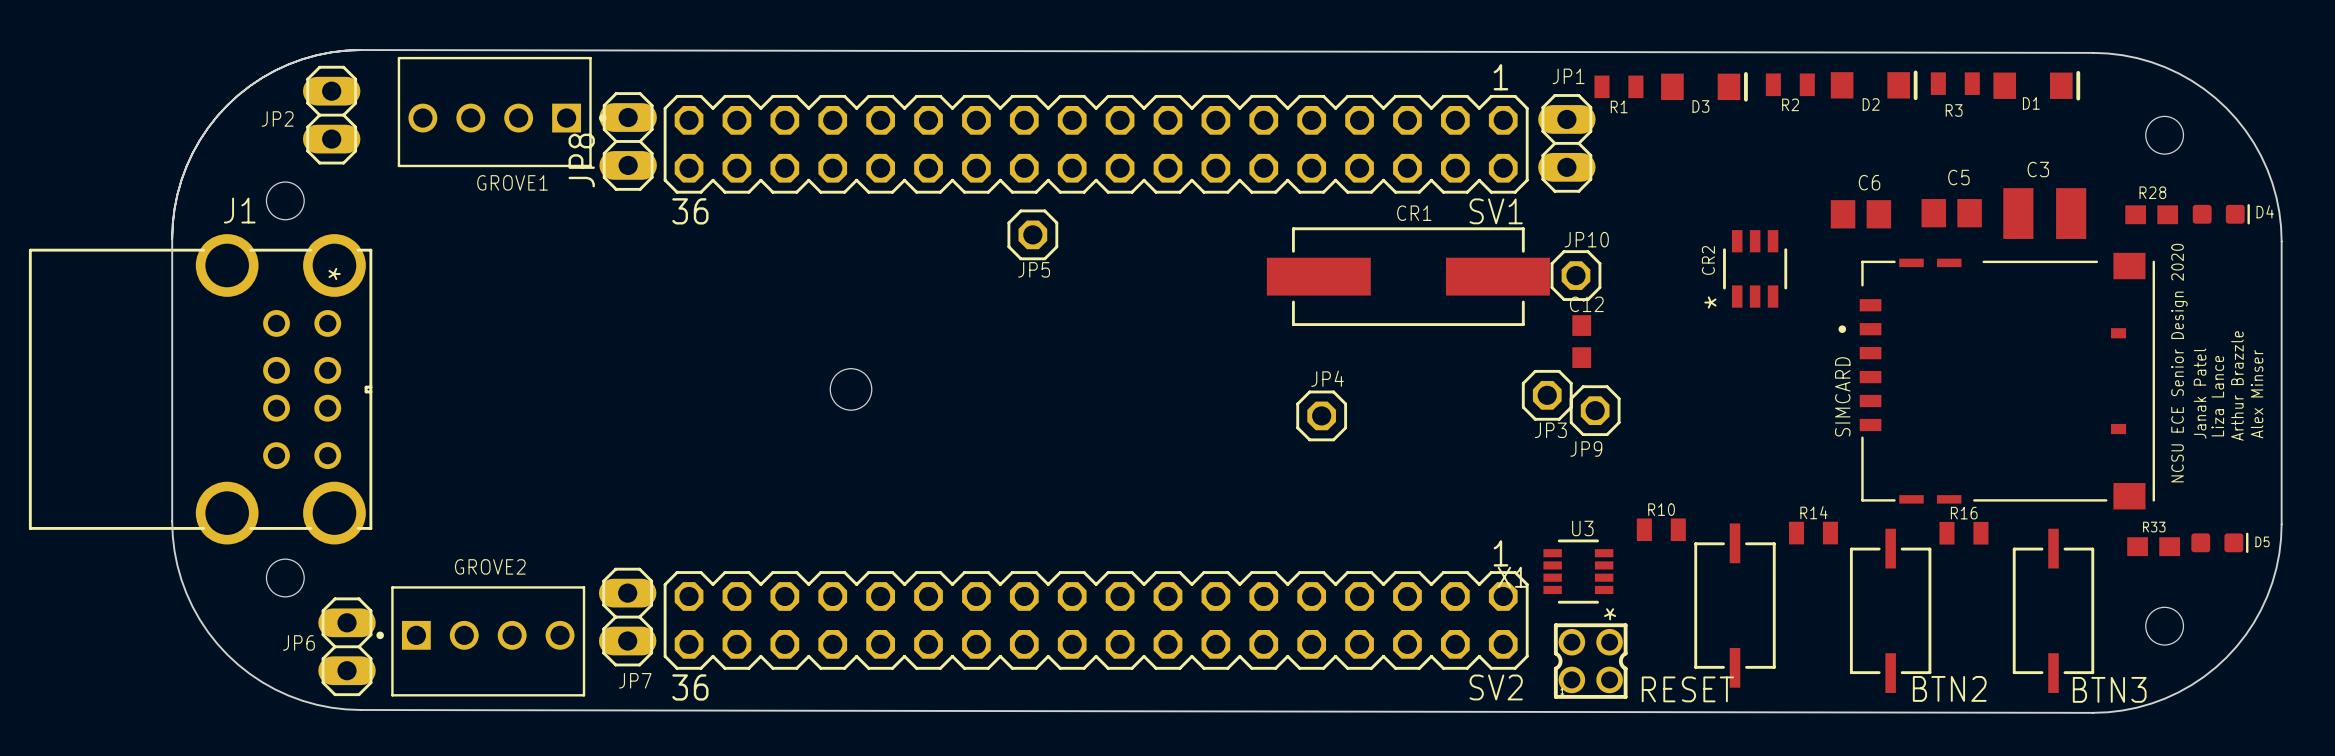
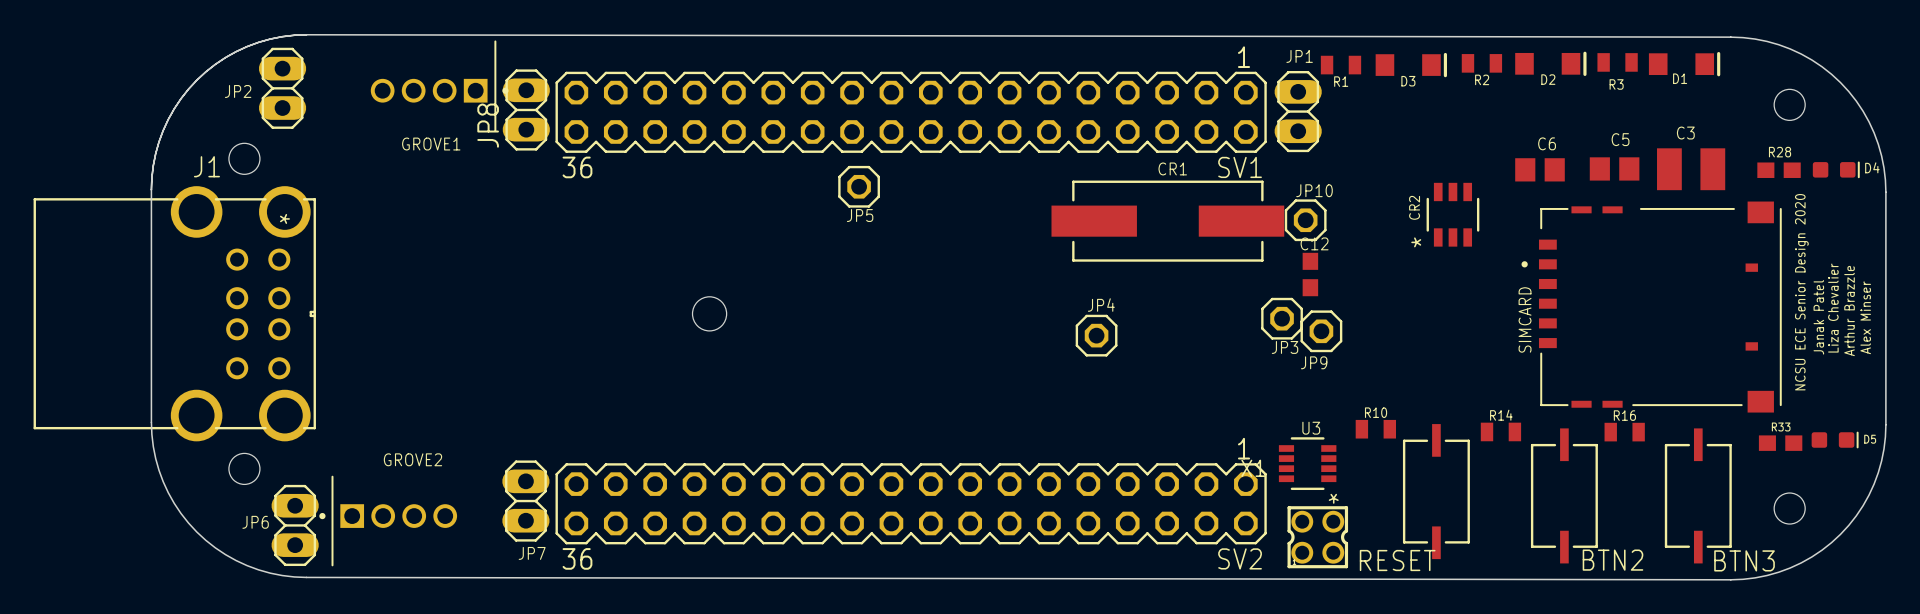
GROVE1 footprint: [397, 56, 607, 168] -> [370, 40, 509, 132]
text: Liza Lance (2217, 396) -> Liza Chevalier (1833, 308)
GROVE2 footprint: [376, 586, 586, 697] -> [319, 475, 458, 567]

